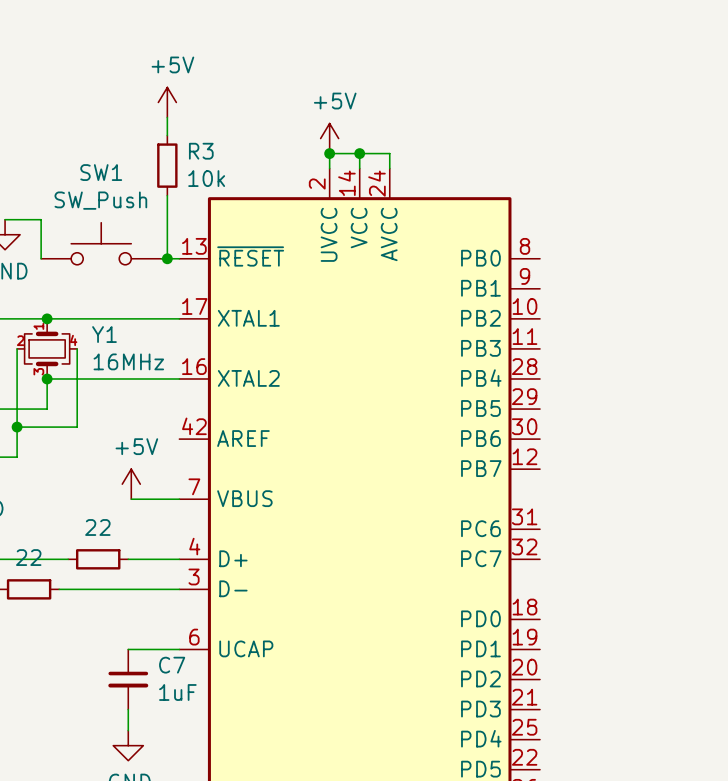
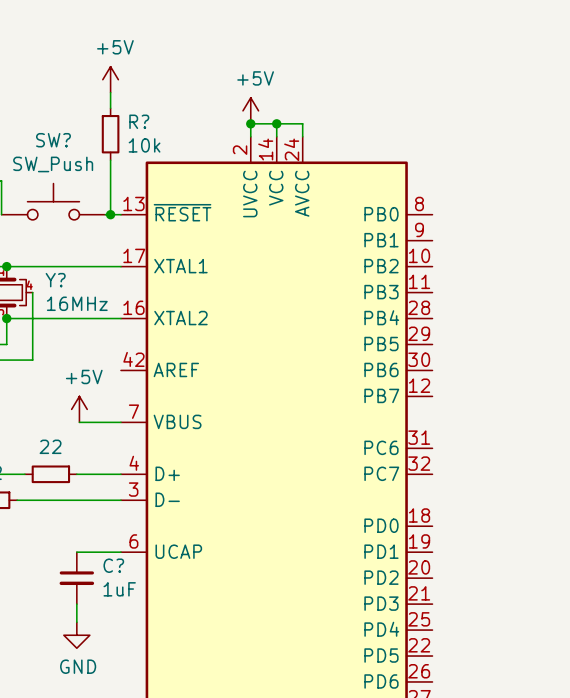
R3 name: R3 (201, 151) -> R? (139, 121)
SW1 name: SW1 (101, 172) -> SW? (53, 140)
Y1 name: Y1 (104, 334) -> Y? (55, 280)
C7 name: C7 (172, 665) -> C? (113, 565)

